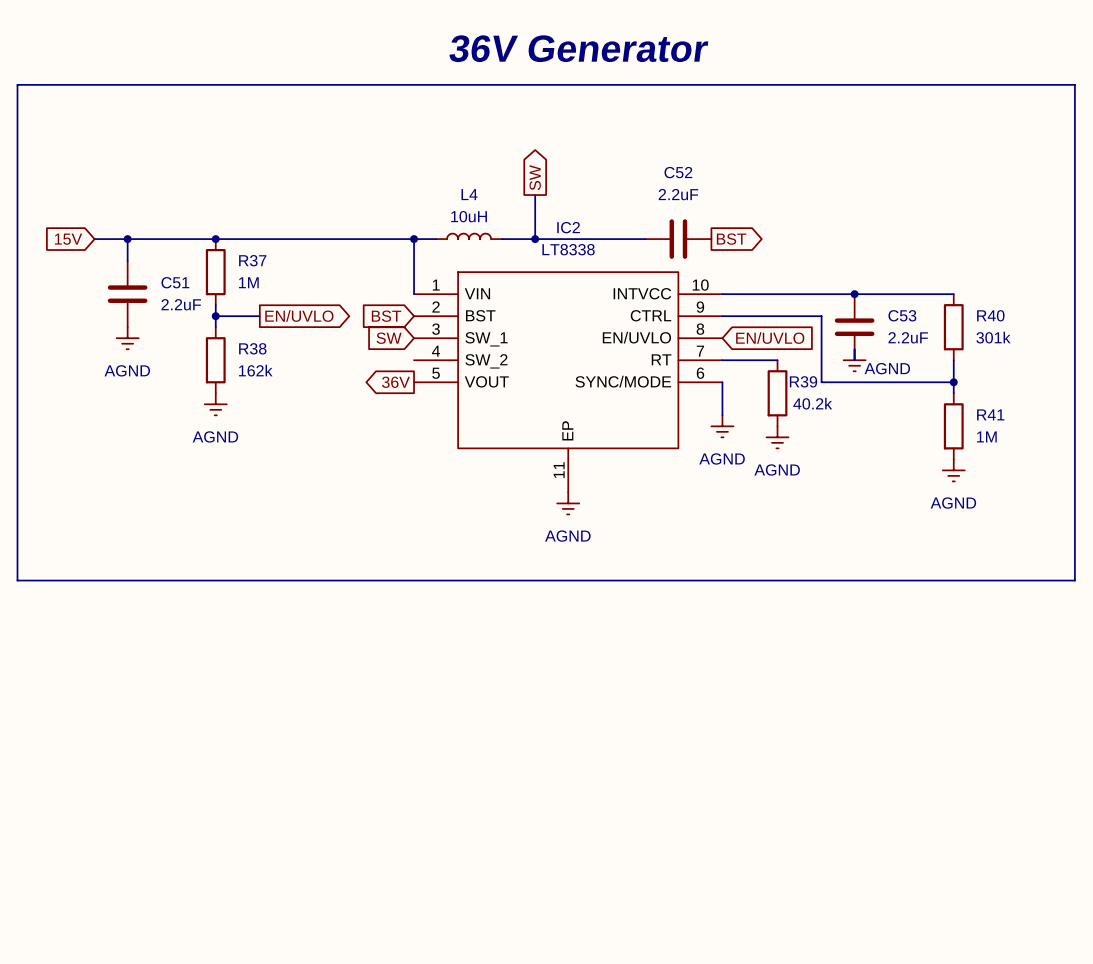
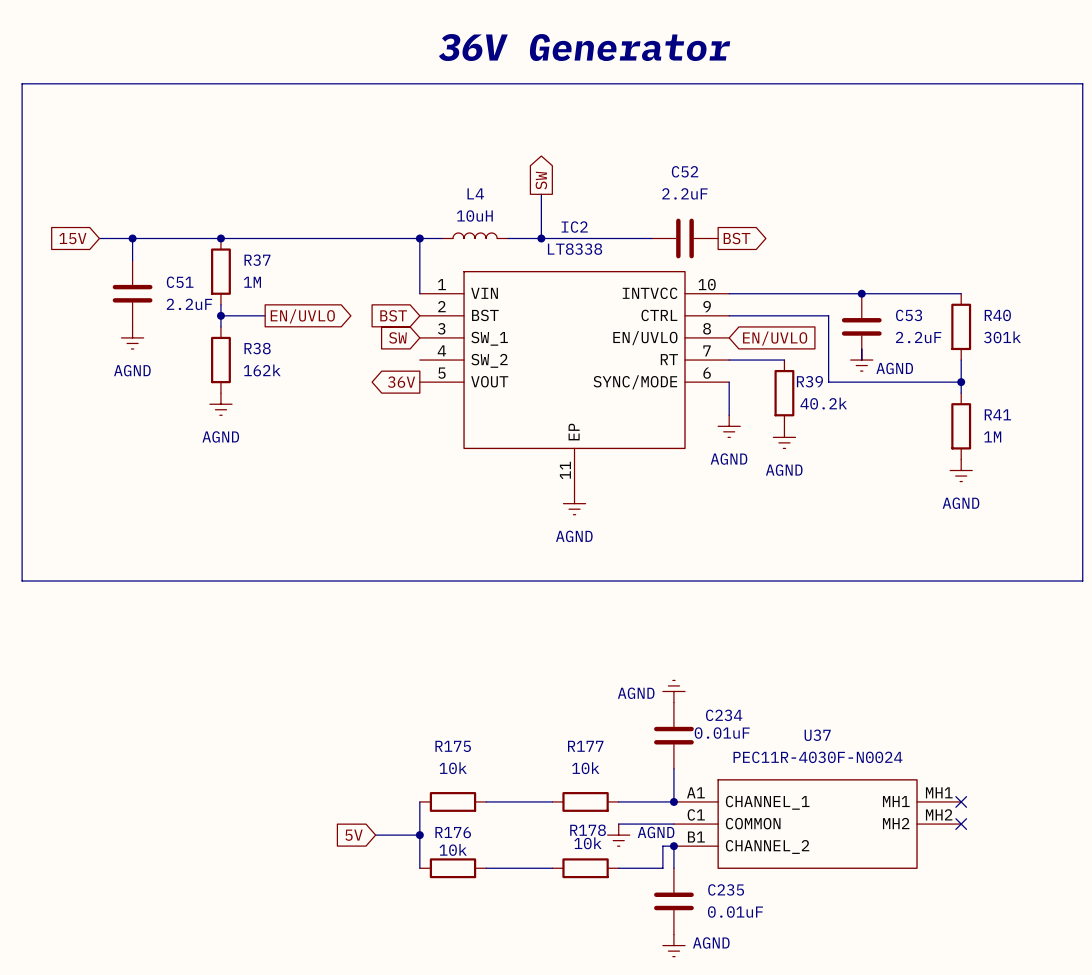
power symbol: none -> AGND (673, 691)
C234: none -> 0.01uF (673, 735)
wire: none -> (673, 768) (673, 801) (618, 801)
wire: none -> (419, 801) (419, 868)
R175: none -> 10k (452, 801)
wire: none -> (486, 801) (552, 801)
R177: none -> 10k (585, 801)
junction: none -> (673, 801)
no-connect mark: none -> (961, 801)
wire: none -> (618, 824) (673, 824)
U37: none -> PEC11R-4030F-N0024 (817, 824)
no-connect mark: none -> (961, 824)
global label: none -> 5V (354, 835)
wire: none -> (375, 835) (419, 835)
junction: none -> (419, 835)
power symbol: none -> AGND (618, 835)
junction: none -> (673, 846)
R176: none -> 10k (452, 868)
wire: none -> (486, 868) (552, 868)
R178: none -> 10k (585, 868)
wire: none -> (618, 868) (662, 868) (662, 846) (673, 846) (673, 868)
C235: none -> 0.01uF (673, 901)
power symbol: none -> AGND (673, 945)

